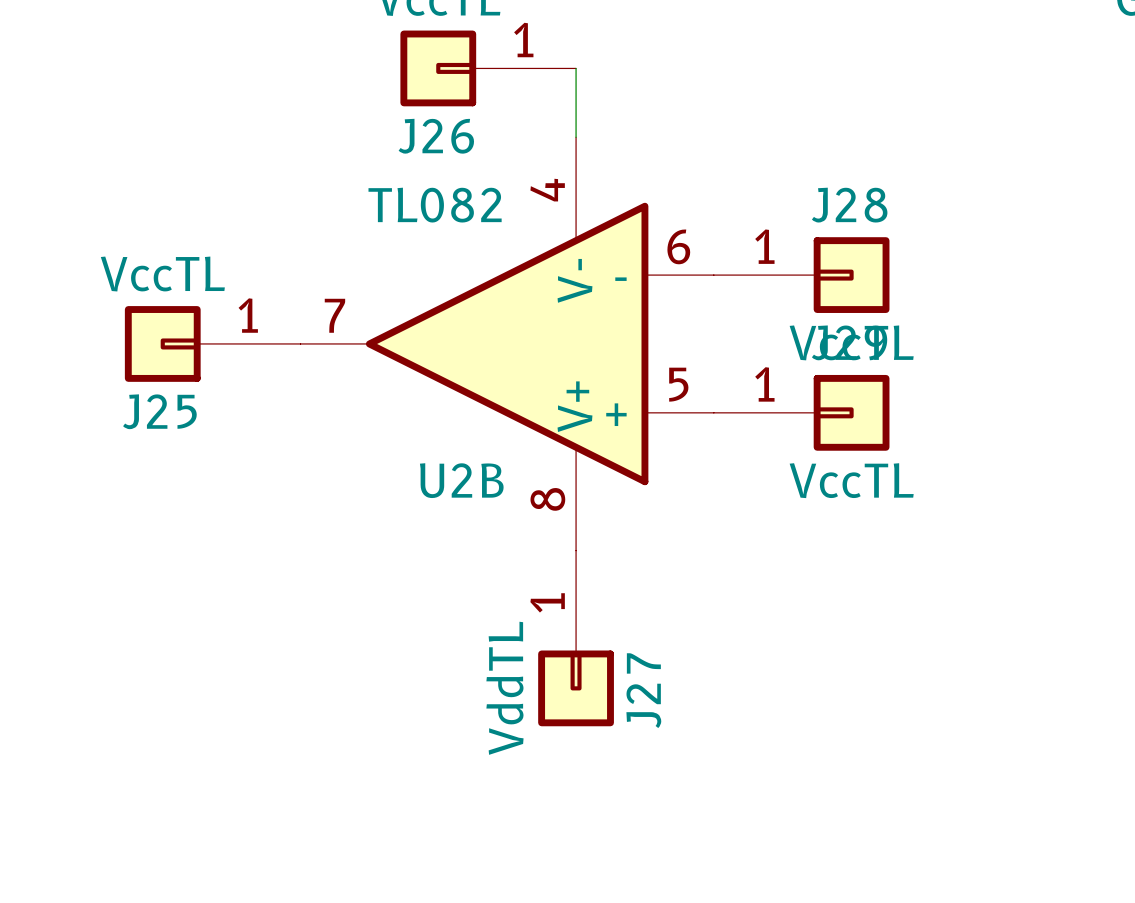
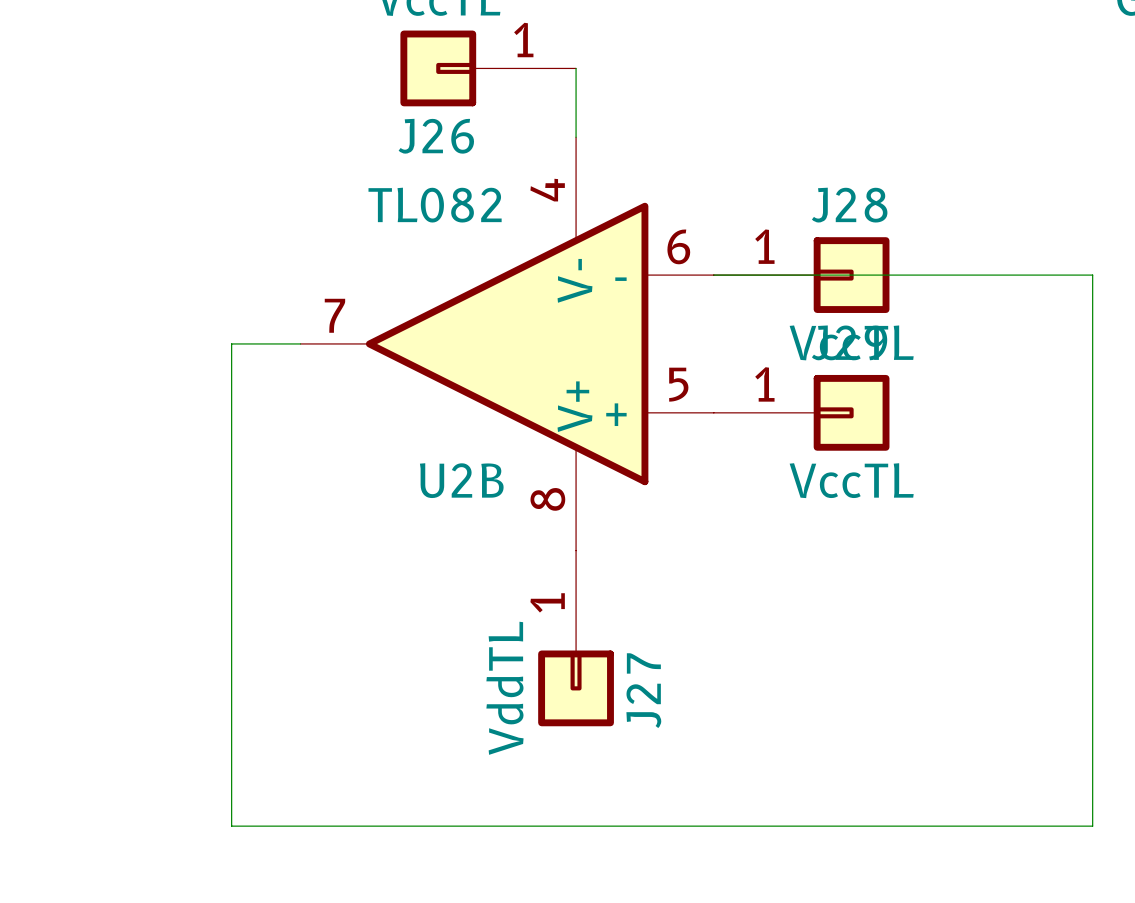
wire: none -> (713, 275) (1092, 275) (1092, 826) (231, 826) (231, 343) (300, 343)
J25: VccTL (212, 343) -> none

